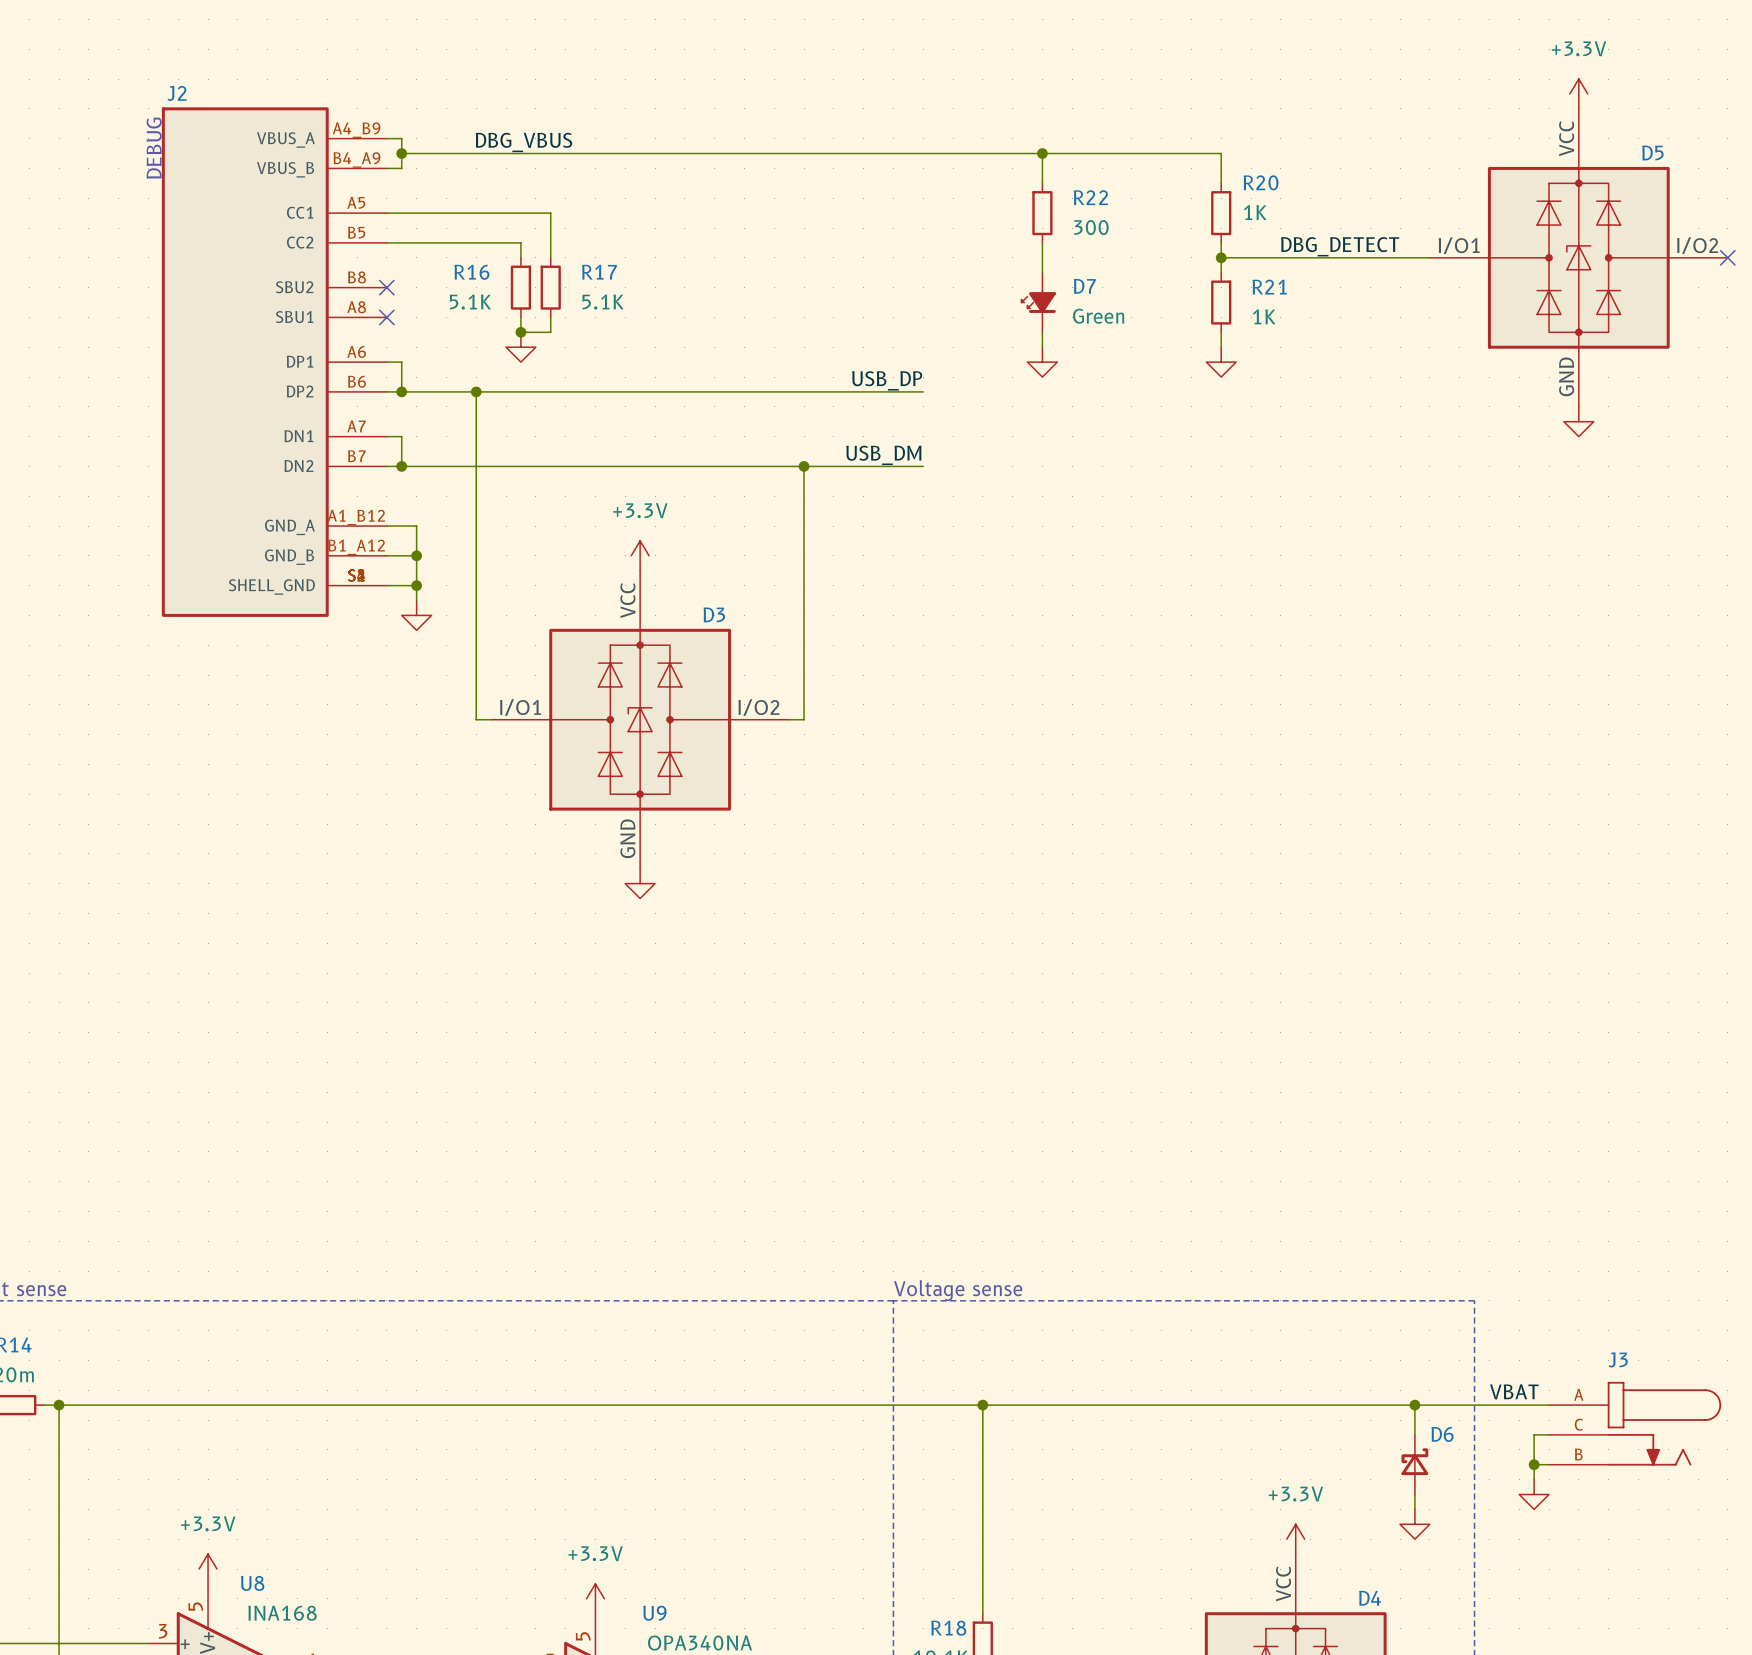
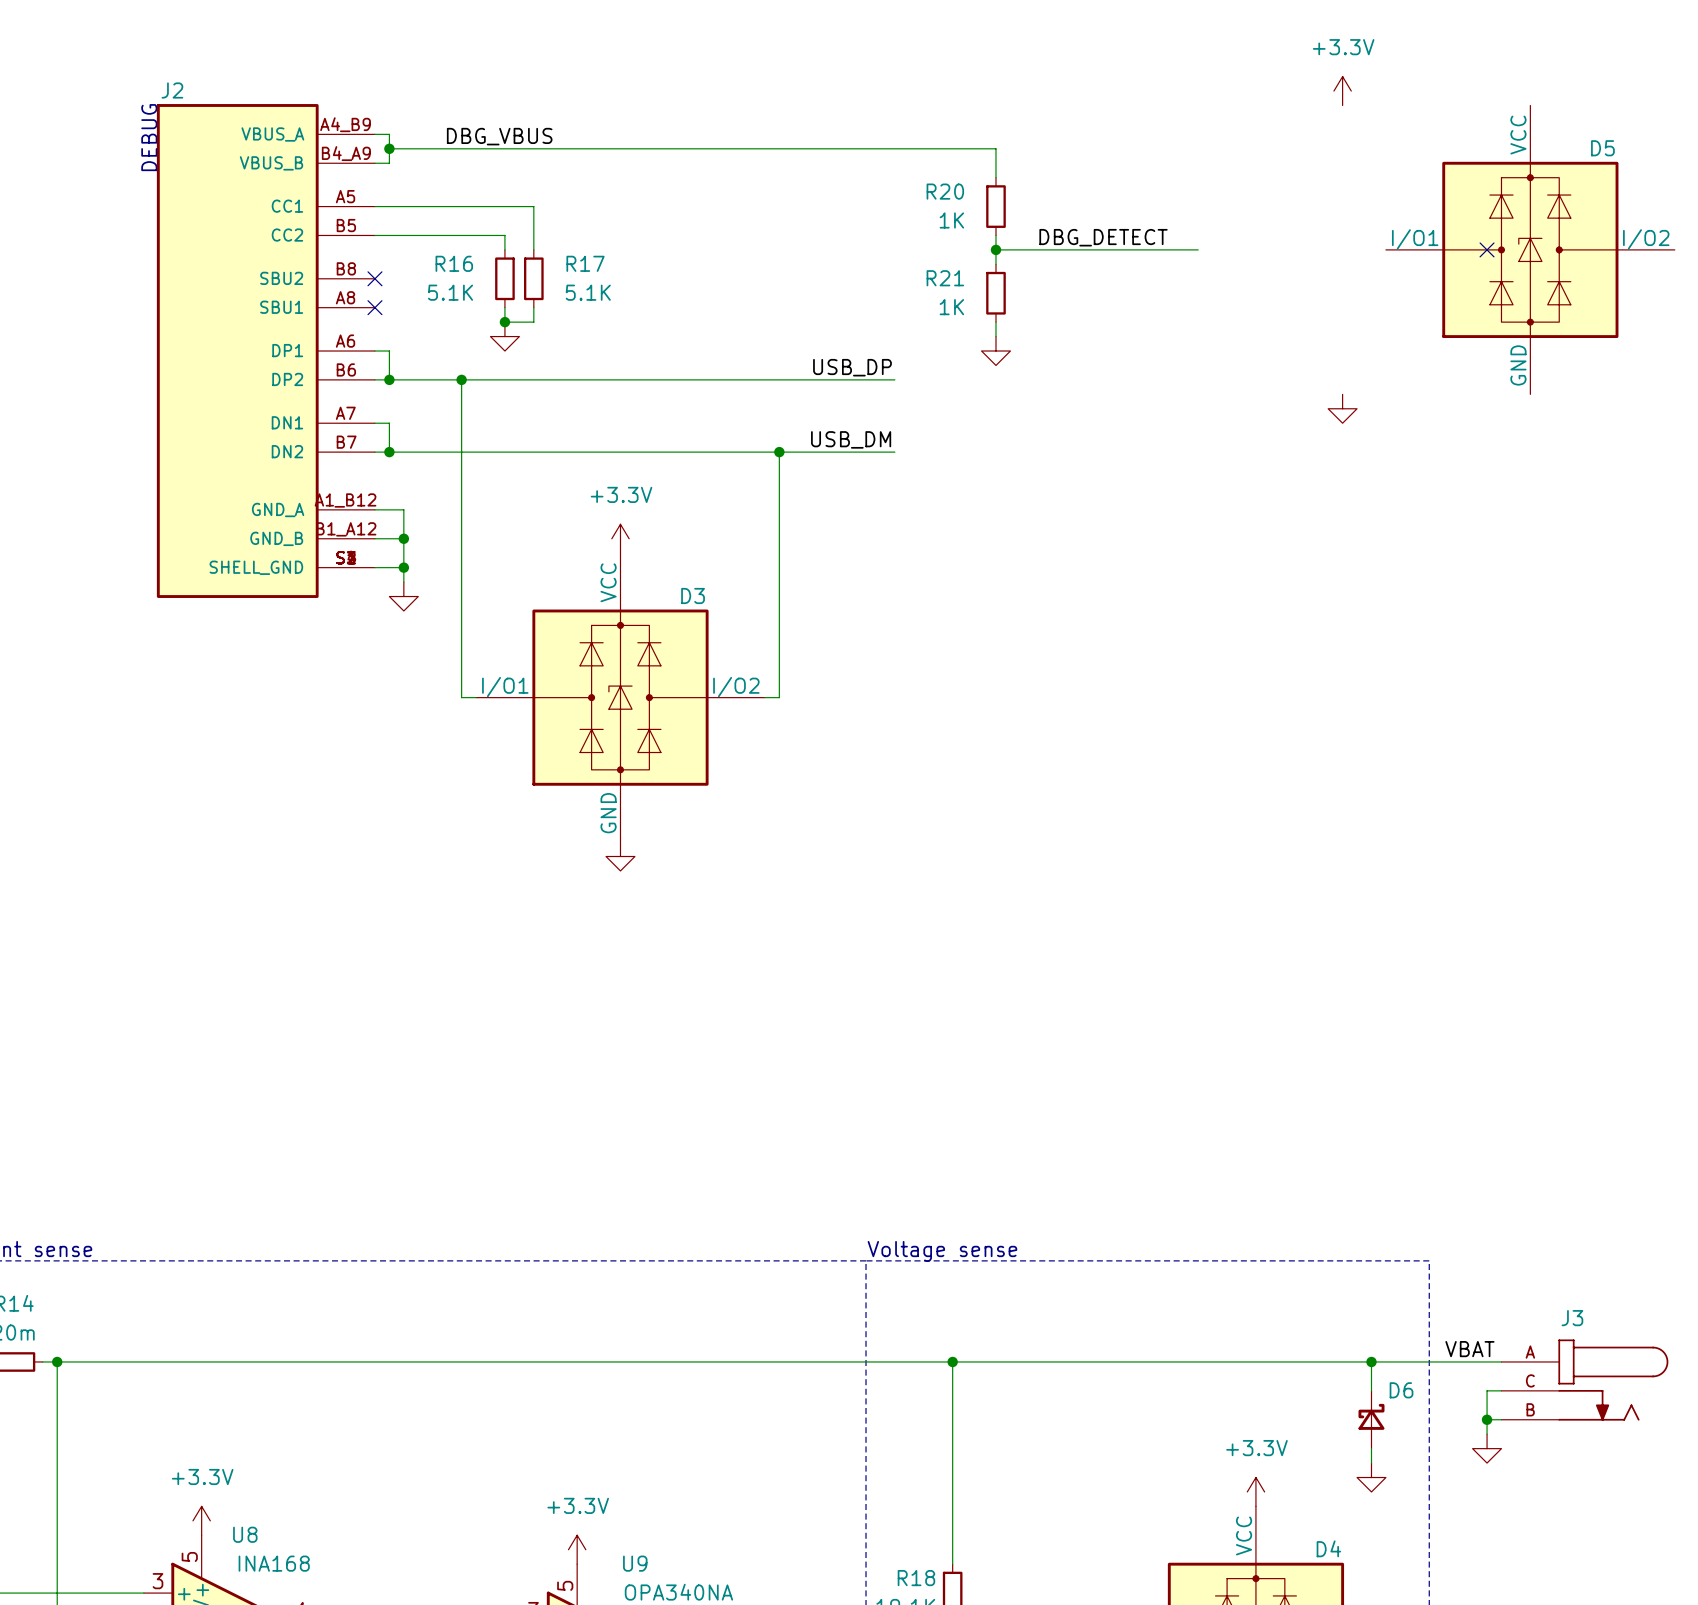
power symbol position: +3.3V (1578, 93) -> +3.3V (1342, 91)
wire: (1027, 153) (1221, 153) (1221, 183) -> (995, 148) (995, 177)
wire: (1042, 153) (1042, 183) -> none
junction: (1042, 153) -> none
R20 name position: R20 (1261, 182) -> R20 (945, 191)
R20 value position: 1K (1255, 212) -> 1K (951, 220)
R22: 300 (1042, 213) -> none
R20 position: (1221, 213) -> (995, 206)
wire: (1042, 242) (1042, 272) -> (995, 235) (995, 264)
wire: (1221, 242) (1221, 272) -> none
label position: DBG_DETECT (1340, 246) -> DBG_DETECT (1103, 237)
junction: none -> (995, 249)
junction: (1221, 257) -> none
wire: (1236, 257) (1429, 257) -> (995, 249) (1183, 249)
no-connect mark: none -> (1487, 249)
no-connect mark: (1727, 257) -> none
R21 name position: R21 (1269, 287) -> R21 (945, 278)
D7: Green (1038, 302) -> none
R21 position: (1221, 302) -> (995, 293)
R21 value position: 1K (1264, 316) -> 1K (951, 307)
wire: (1042, 332) (1042, 347) -> (995, 322) (995, 336)
wire: (1221, 332) (1221, 347) -> none
power symbol position: (1042, 362) -> (995, 351)
power symbol: (1221, 362) -> none
power symbol: none -> (1342, 408)
power symbol: (1578, 421) -> none

